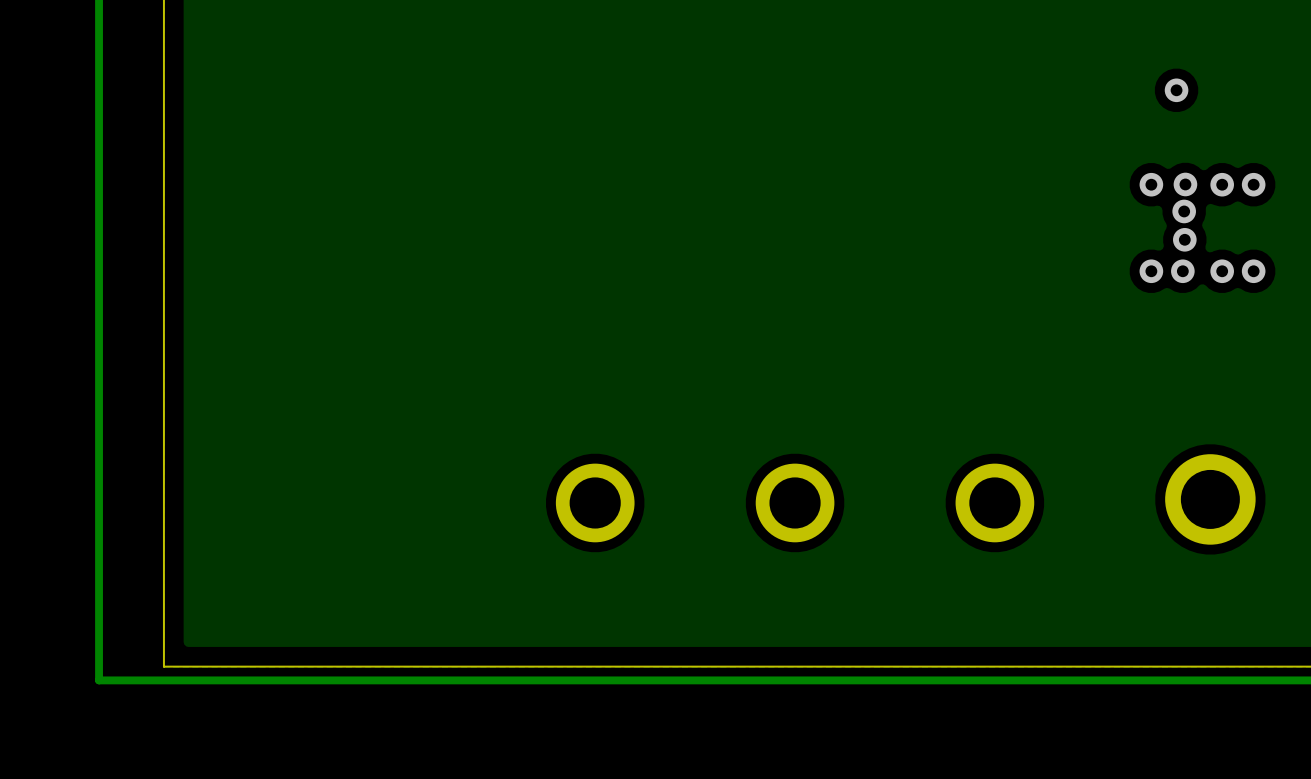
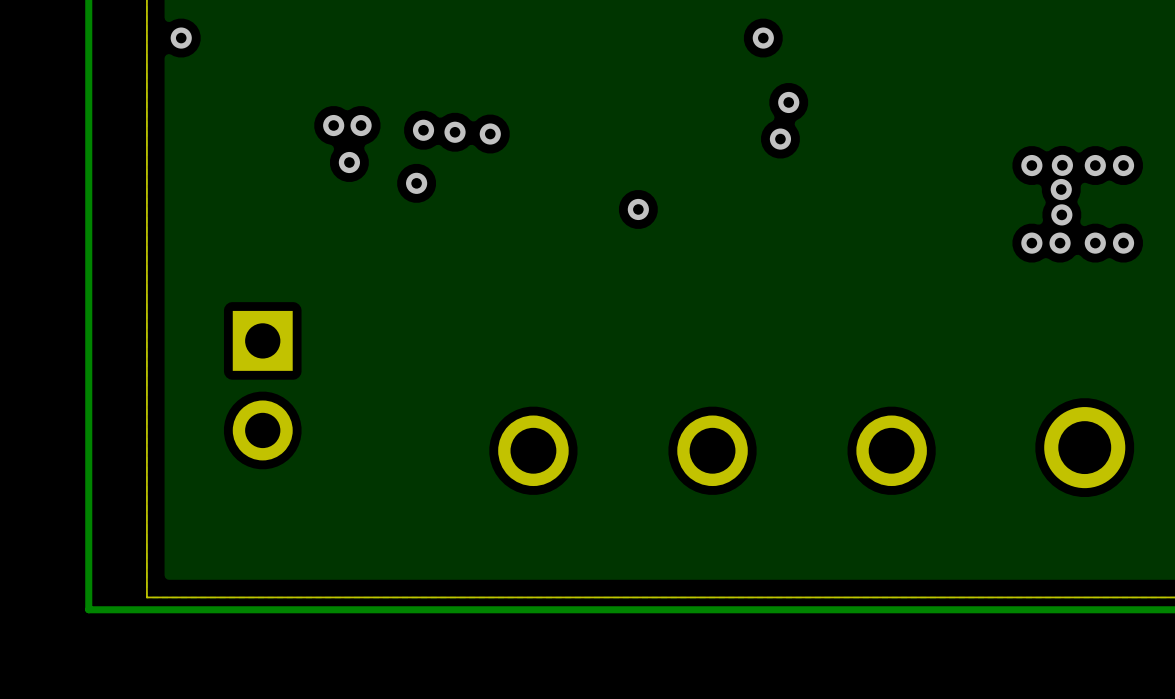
via: none -> (181, 38)
via: none -> (763, 38)
via: (1176, 90) -> none
via: none -> (788, 102)
via: none -> (333, 125)
via: none -> (361, 125)
via: none -> (423, 130)
via: none -> (455, 132)
via: none -> (490, 134)
via: none -> (780, 139)
via: none -> (349, 162)
via: none -> (416, 183)
via: none -> (638, 209)
part: none -> (262, 385)

